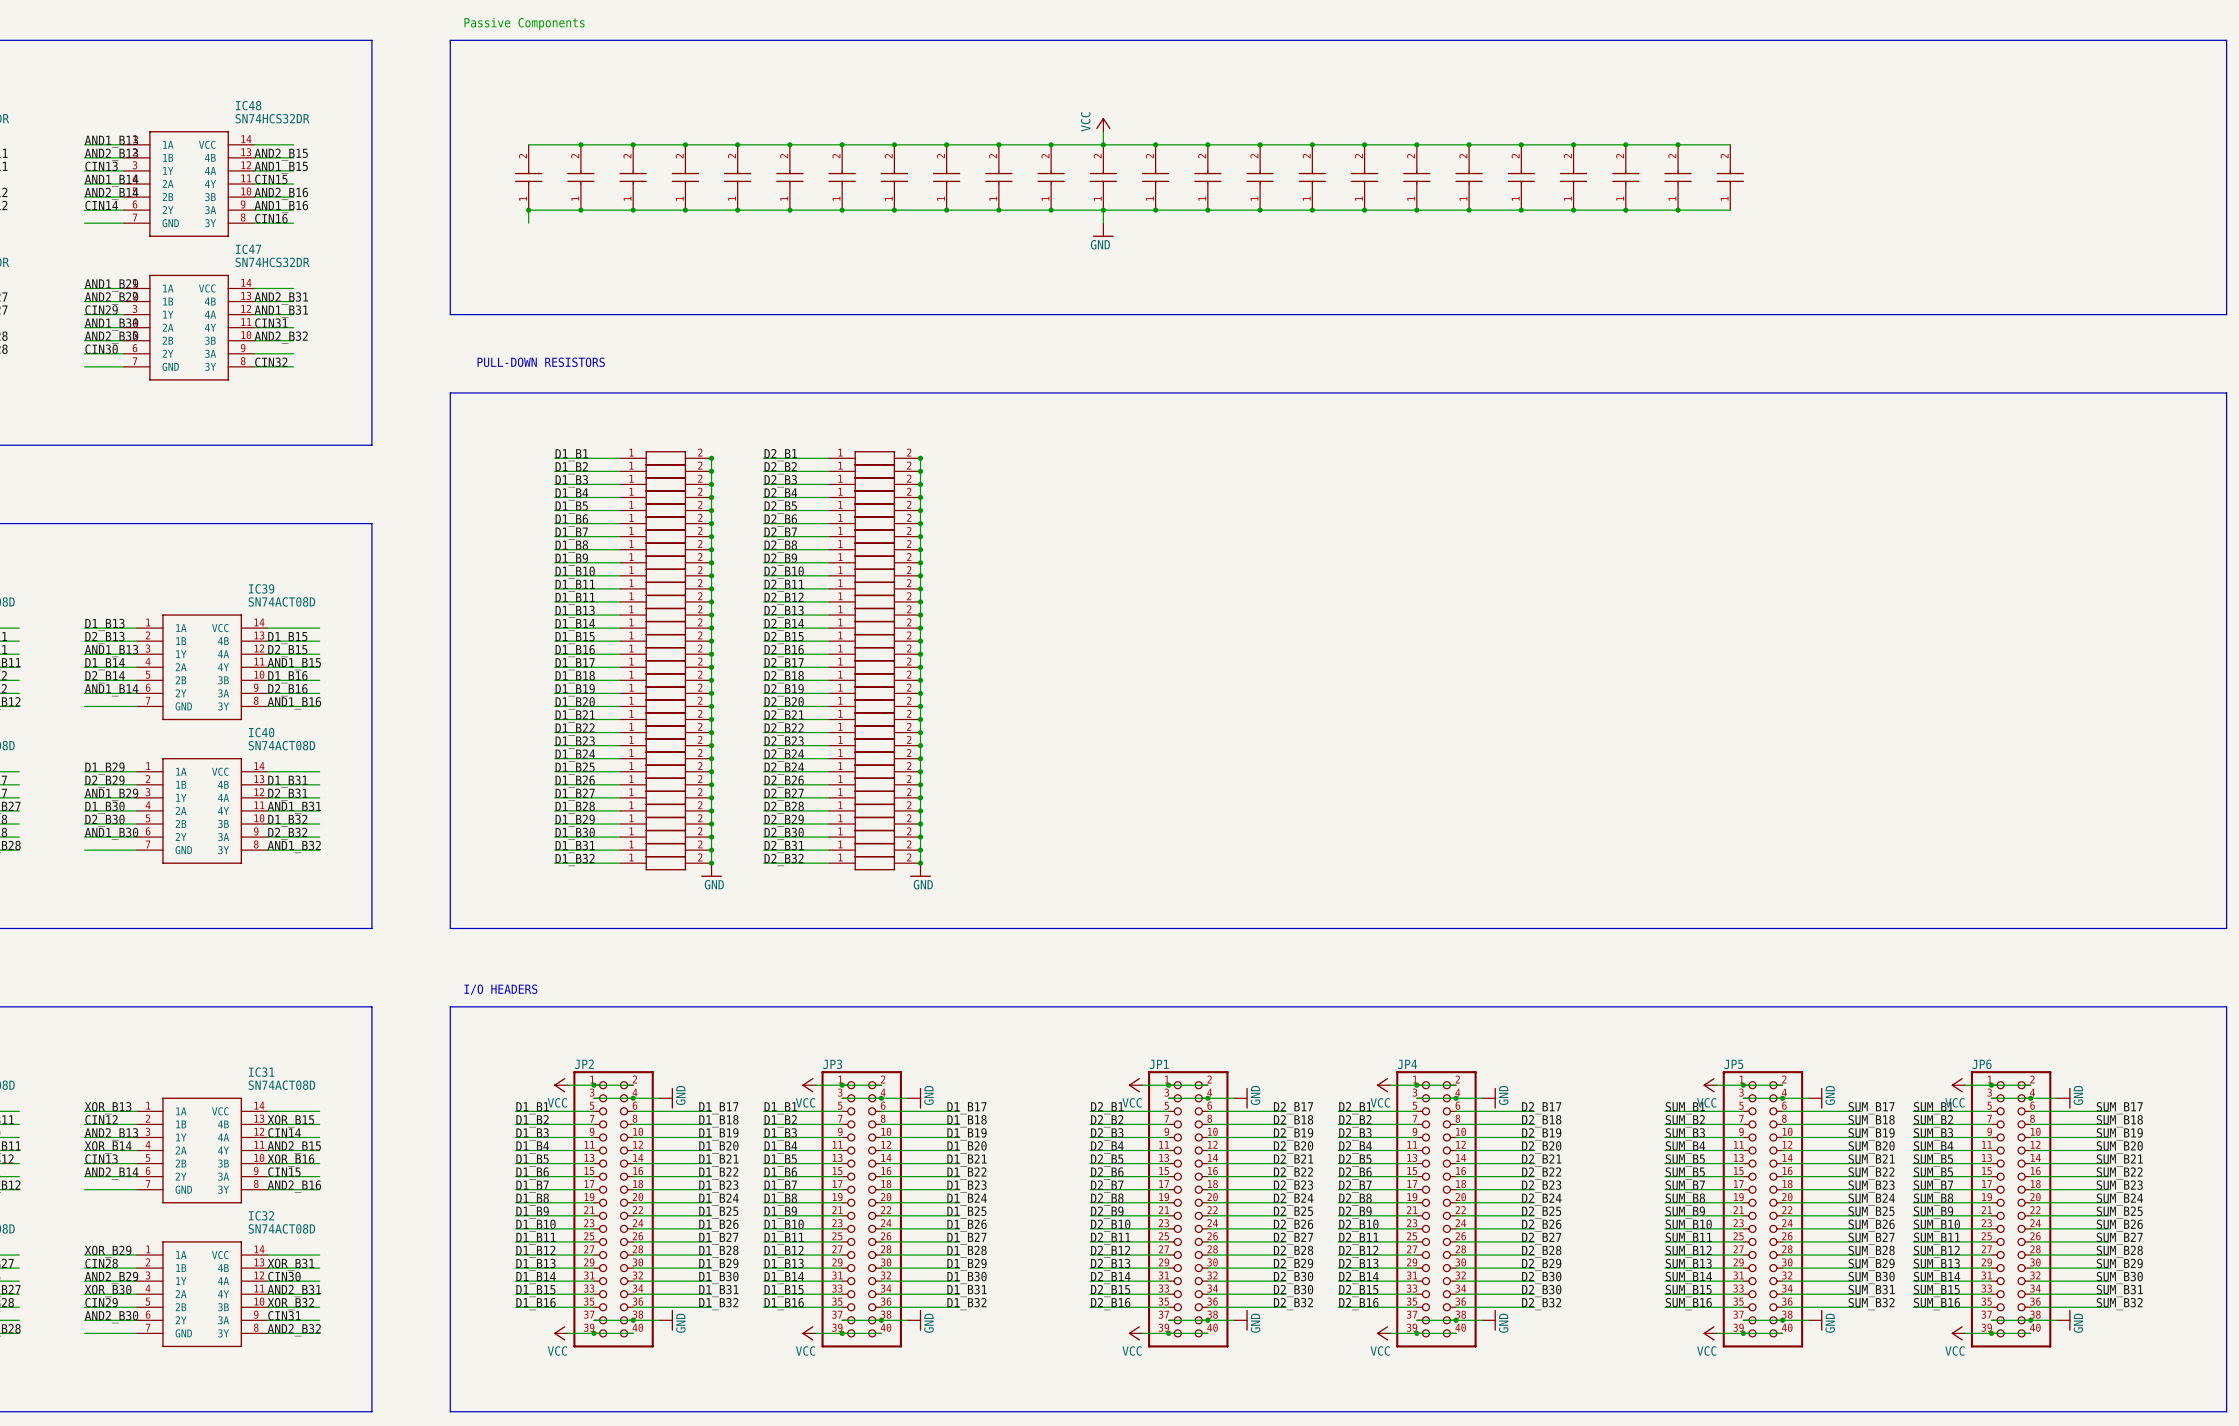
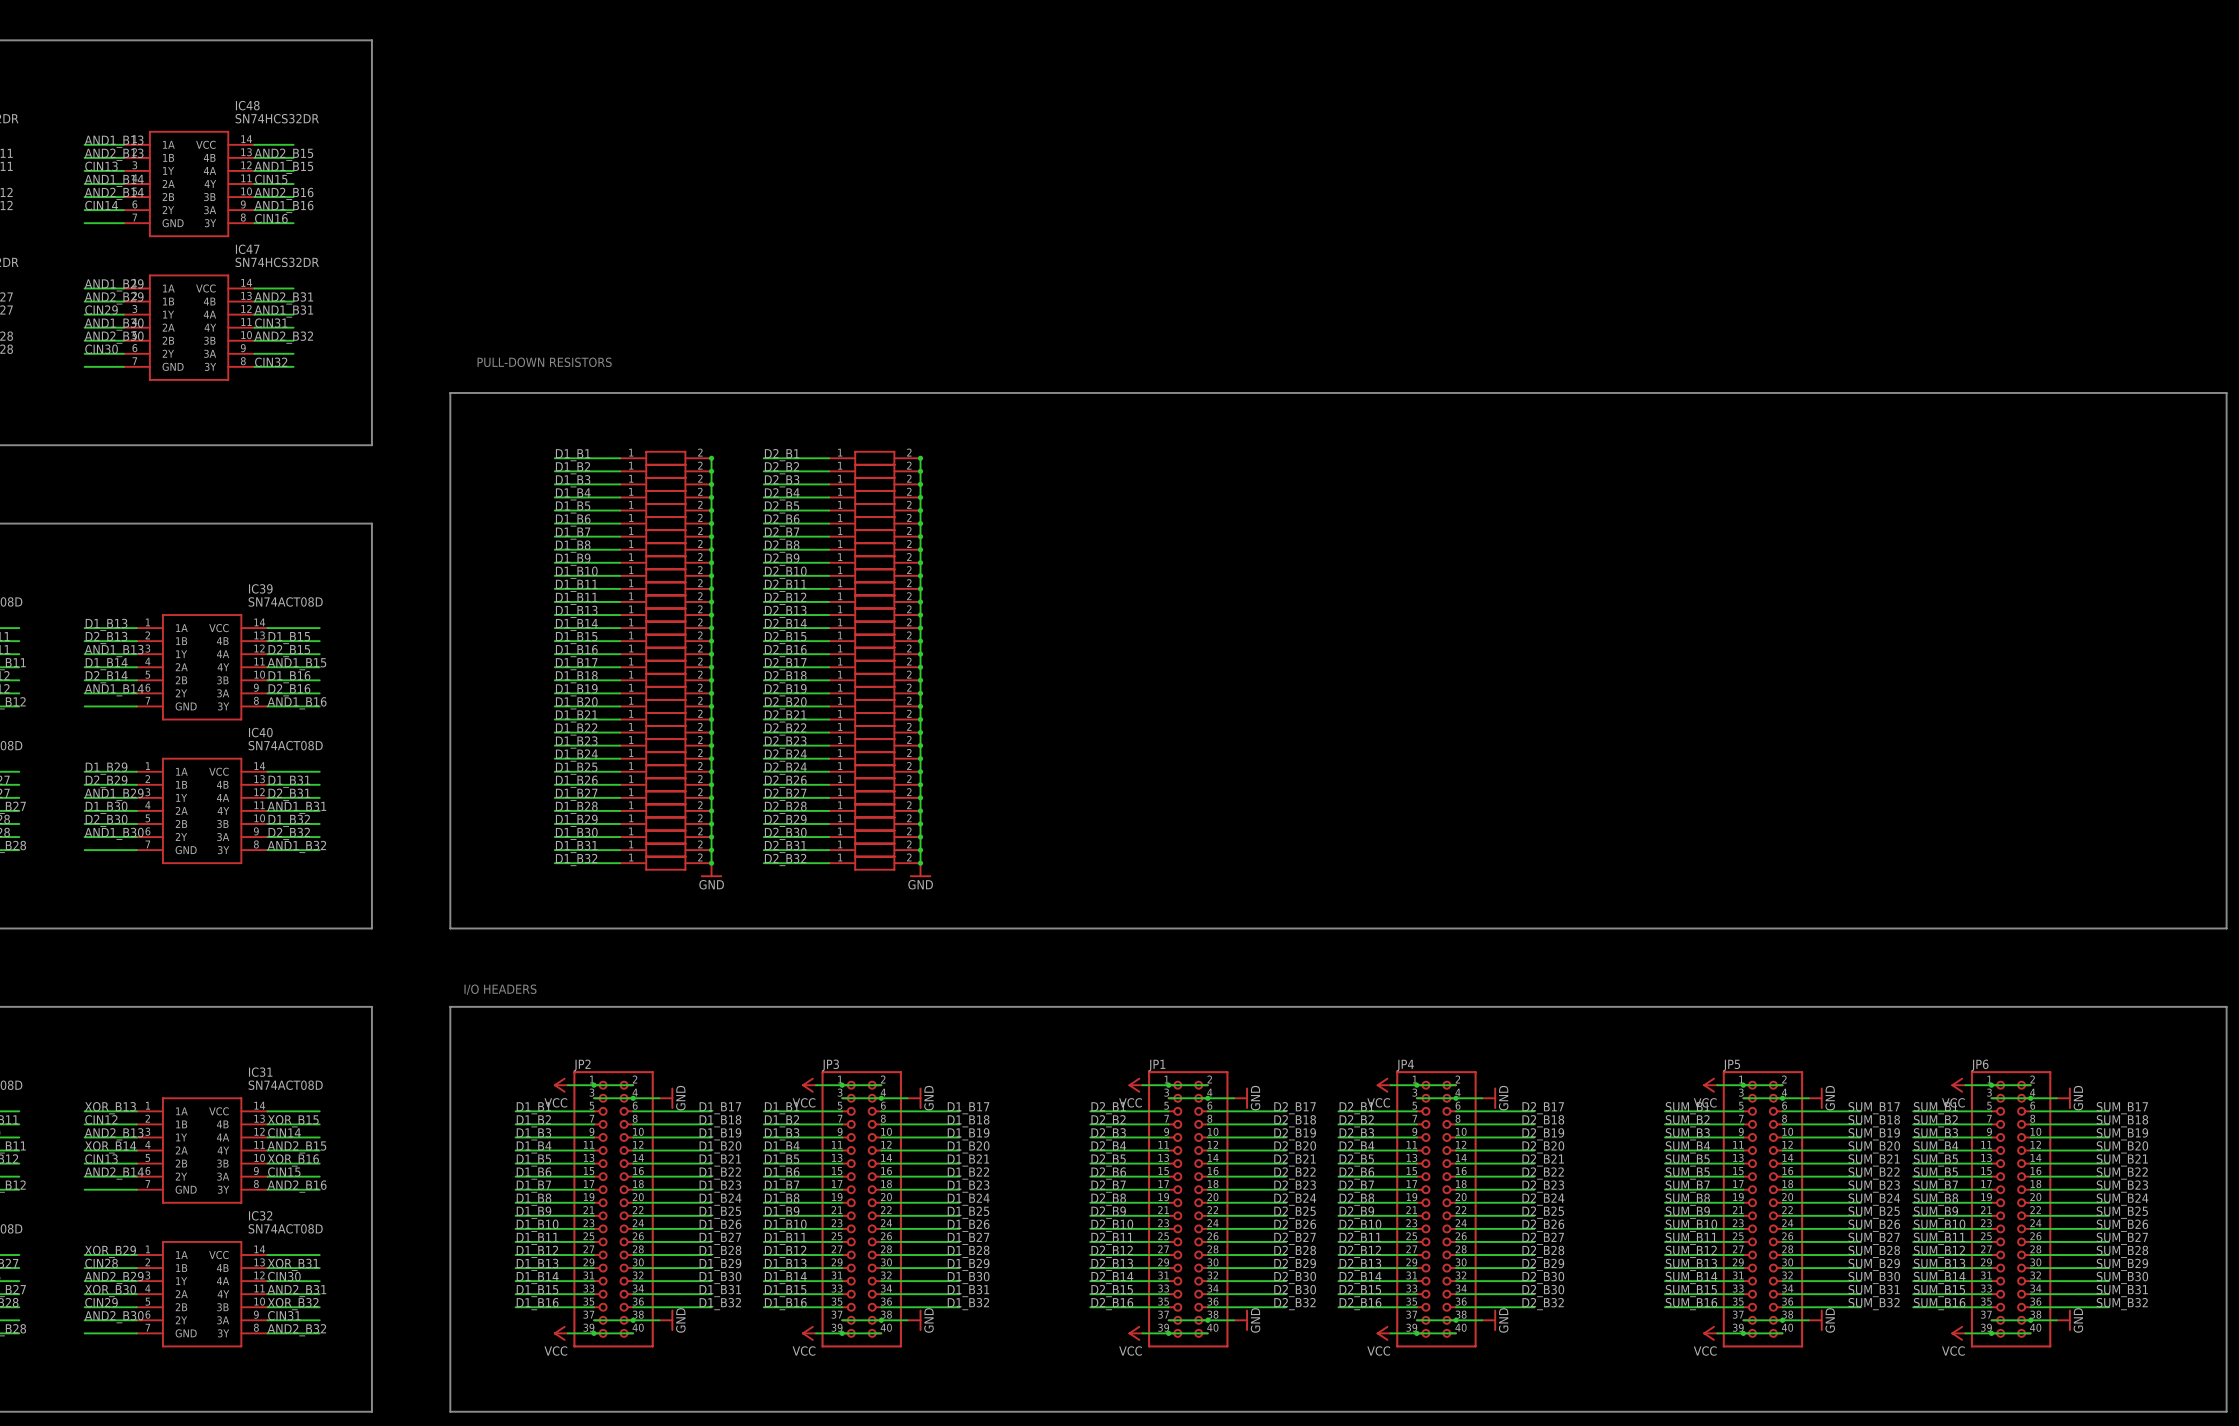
text: Passive Components (524, 23) -> none
line: (450, 40) (450, 314) (2226, 314) (2226, 40) (450, 40) -> none
power symbol: VCC (1103, 124) -> none
wire: (1103, 131) (1103, 144) -> none
wire: (528, 144) (1730, 144) -> none
junction: (580, 144) -> none
junction: (633, 144) -> none
junction: (685, 144) -> none
junction: (737, 144) -> none
junction: (789, 144) -> none
junction: (842, 144) -> none
junction: (894, 144) -> none
junction: (946, 144) -> none
junction: (998, 144) -> none
junction: (1051, 144) -> none
junction: (1103, 144) -> none
junction: (1155, 144) -> none
junction: (1207, 144) -> none
junction: (1260, 144) -> none
junction: (1312, 144) -> none
junction: (1364, 144) -> none
junction: (1416, 144) -> none
junction: (1469, 144) -> none
junction: (1521, 144) -> none
junction: (1573, 144) -> none
junction: (1625, 144) -> none
junction: (1678, 144) -> none
part: (528, 177) -> none
part: (580, 177) -> none
part: (633, 177) -> none
part: (685, 177) -> none
part: (737, 177) -> none
part: (789, 177) -> none
part: (842, 177) -> none
part: (894, 177) -> none
part: (946, 177) -> none
part: (998, 177) -> none
part: (1051, 177) -> none
part: (1103, 177) -> none
part: (1155, 177) -> none
part: (1207, 177) -> none
part: (1260, 177) -> none
part: (1312, 177) -> none
part: (1364, 177) -> none
part: (1416, 177) -> none
part: (1469, 177) -> none
part: (1521, 177) -> none
part: (1573, 177) -> none
part: (1625, 177) -> none
part: (1678, 177) -> none
part: (1730, 177) -> none
junction: (528, 210) -> none
junction: (580, 210) -> none
junction: (633, 210) -> none
junction: (685, 210) -> none
junction: (737, 210) -> none
junction: (789, 210) -> none
junction: (842, 210) -> none
junction: (894, 210) -> none
junction: (946, 210) -> none
junction: (998, 210) -> none
junction: (1051, 210) -> none
wire: (1103, 210) (1103, 223) -> none
junction: (1103, 210) -> none
junction: (1155, 210) -> none
junction: (1207, 210) -> none
junction: (1260, 210) -> none
junction: (1312, 210) -> none
junction: (1364, 210) -> none
junction: (1416, 210) -> none
junction: (1469, 210) -> none
junction: (1521, 210) -> none
junction: (1573, 210) -> none
junction: (1625, 210) -> none
junction: (1678, 210) -> none
wire: (1730, 210) (528, 210) (528, 223) -> none
power symbol: GND (1103, 230) -> none

